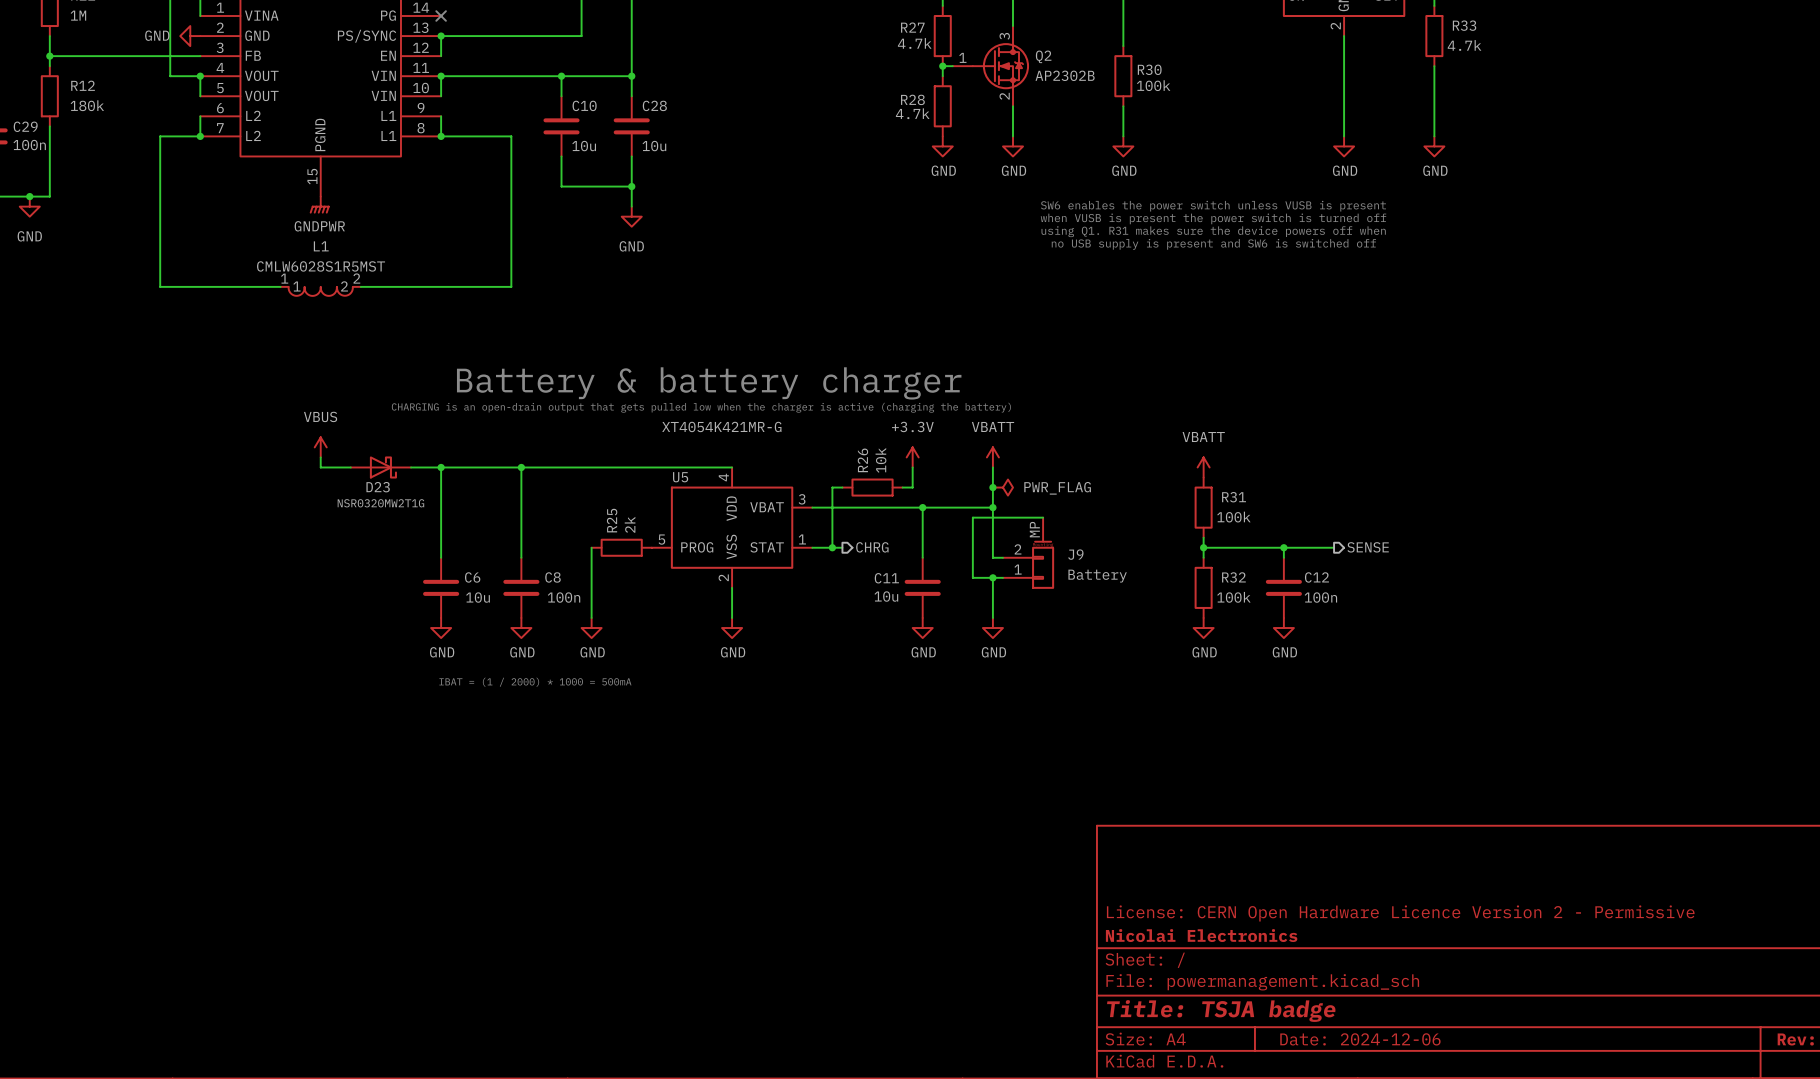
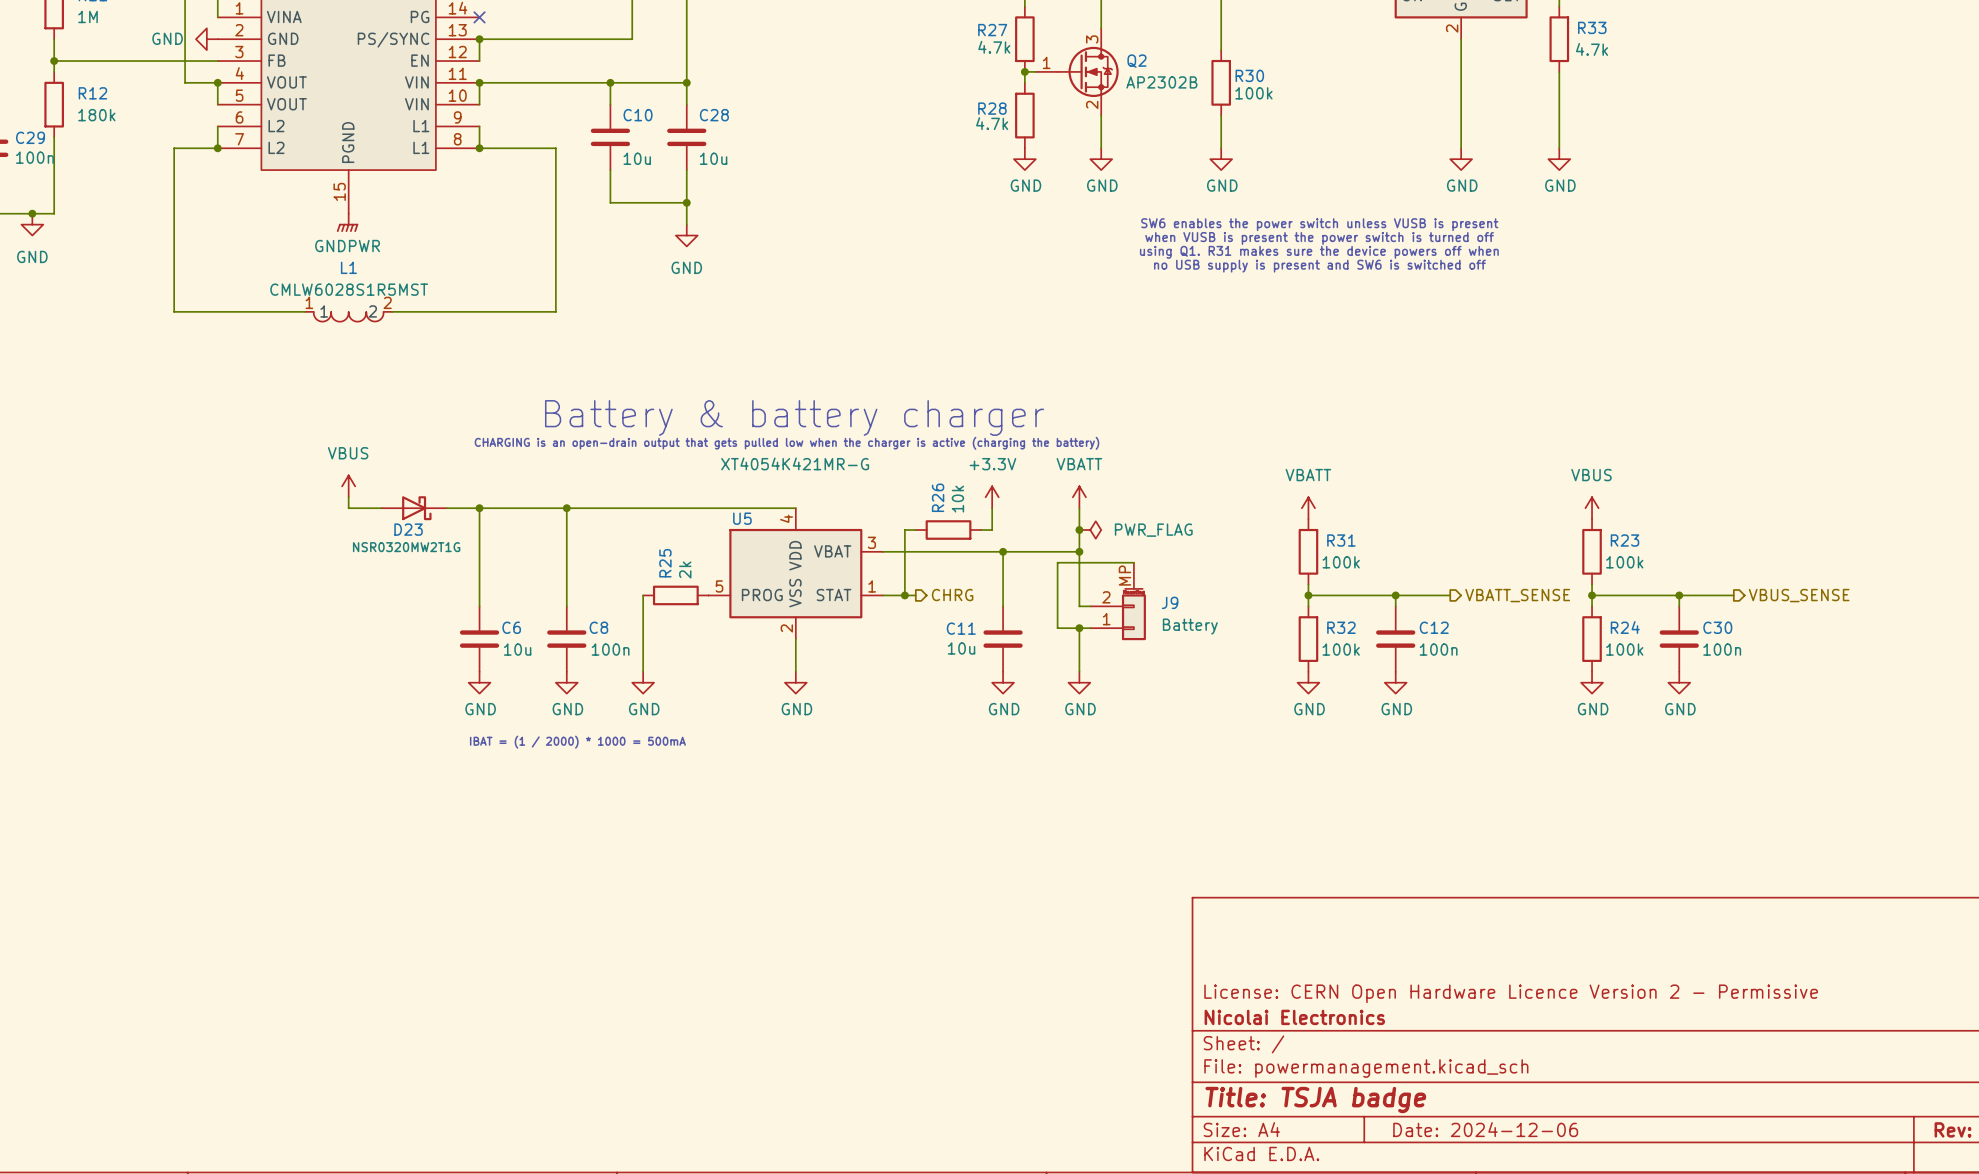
power symbol: none -> VBUS (1592, 508)
R23: none -> 100k (1592, 551)
wire: none -> (1592, 584) (1592, 606)
hierarchical label: SENSE (1368, 547) -> VBATT_SENSE (1517, 595)
wire: none -> (1592, 595) (1733, 595)
junction: none -> (1592, 595)
wire: none -> (1679, 595) (1679, 606)
junction: none -> (1679, 595)
hierarchical label: none -> VBUS_SENSE (1799, 595)
R24: none -> 100k (1592, 639)
C30: none -> 100n (1679, 639)
power symbol: none -> GND (1592, 682)
power symbol: none -> GND (1679, 682)

